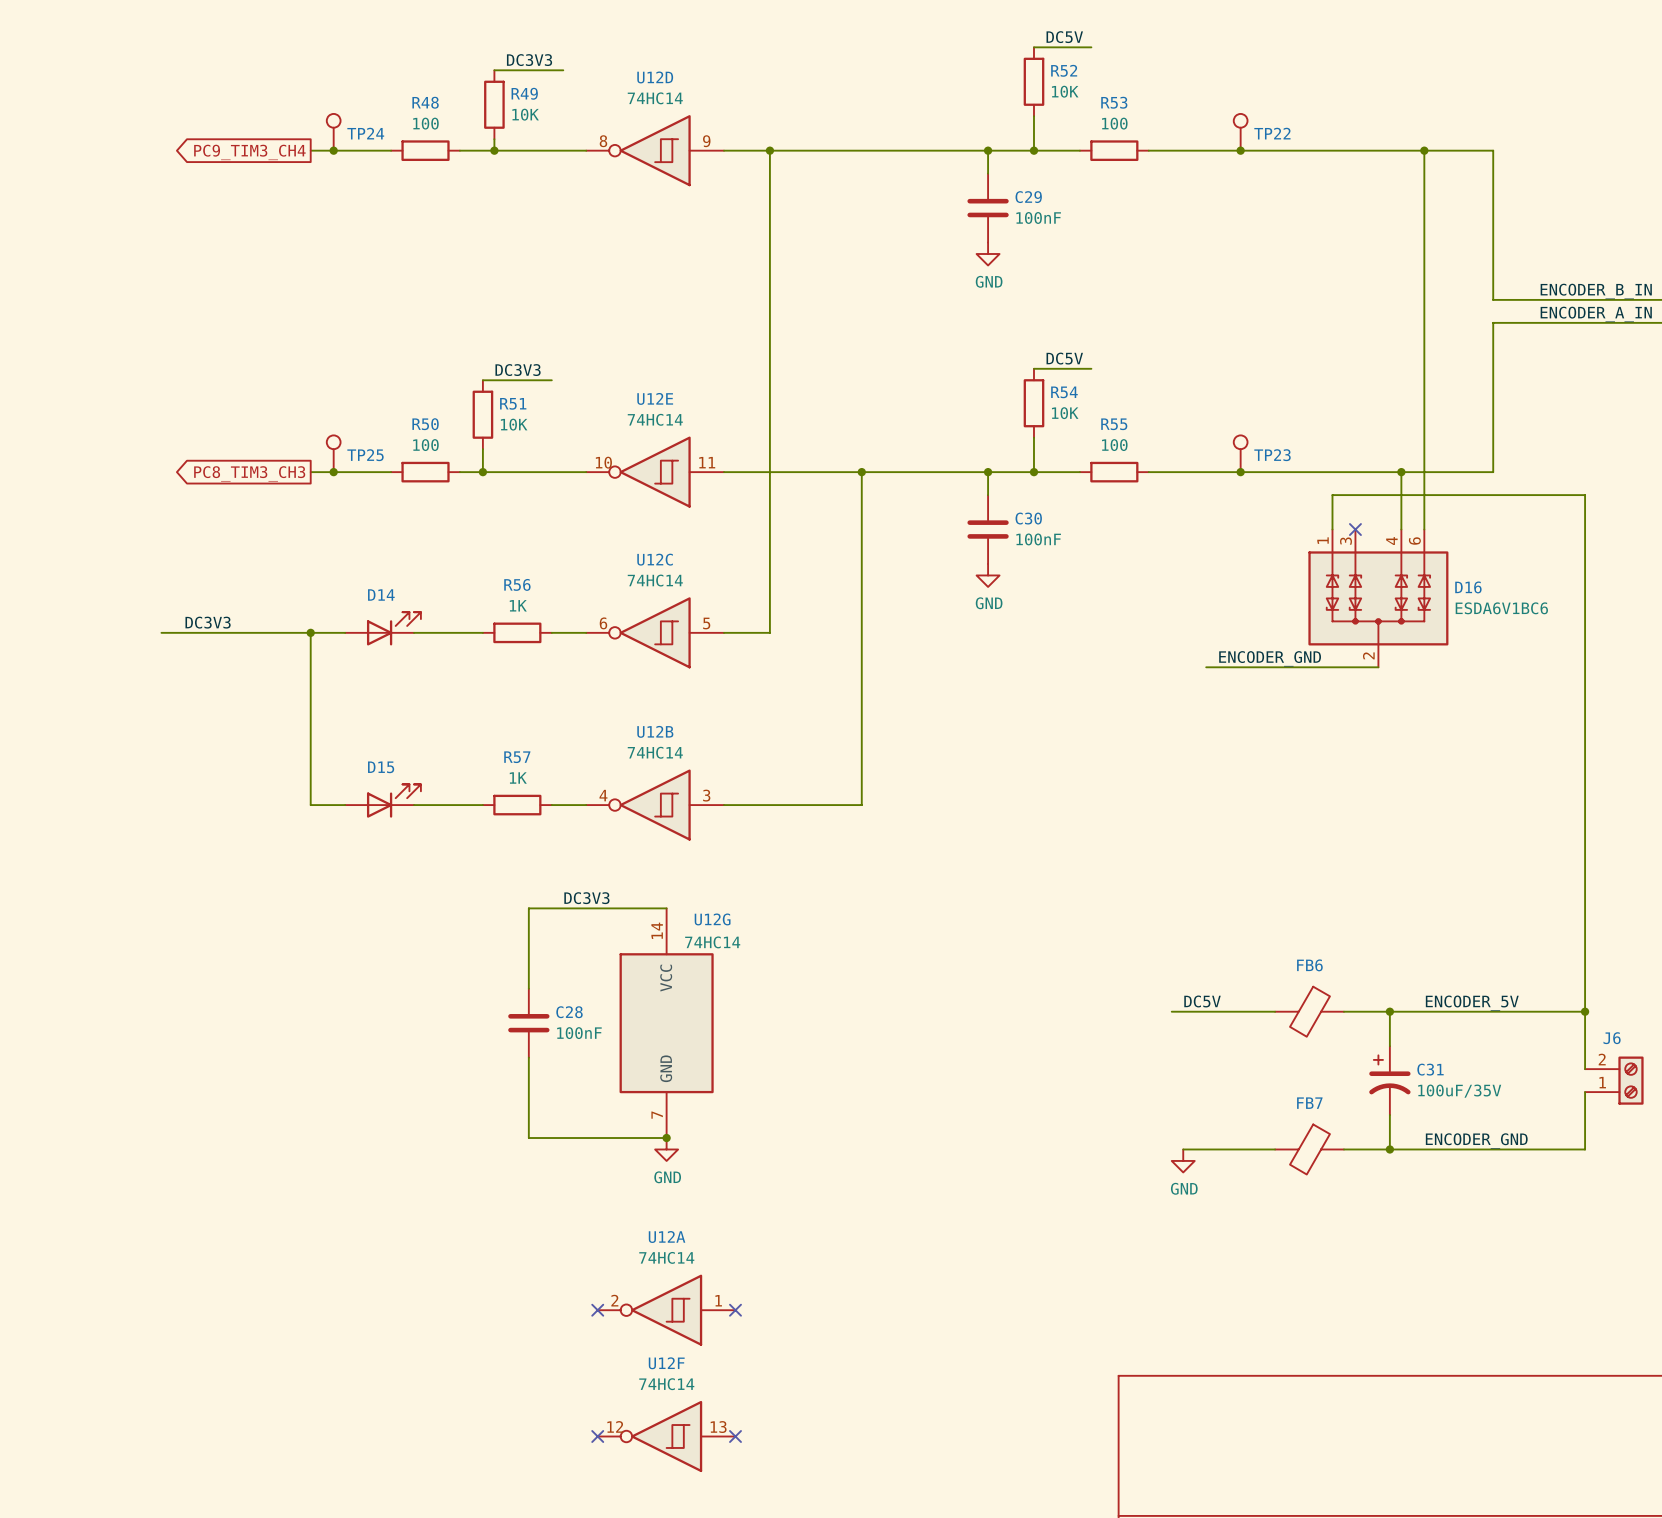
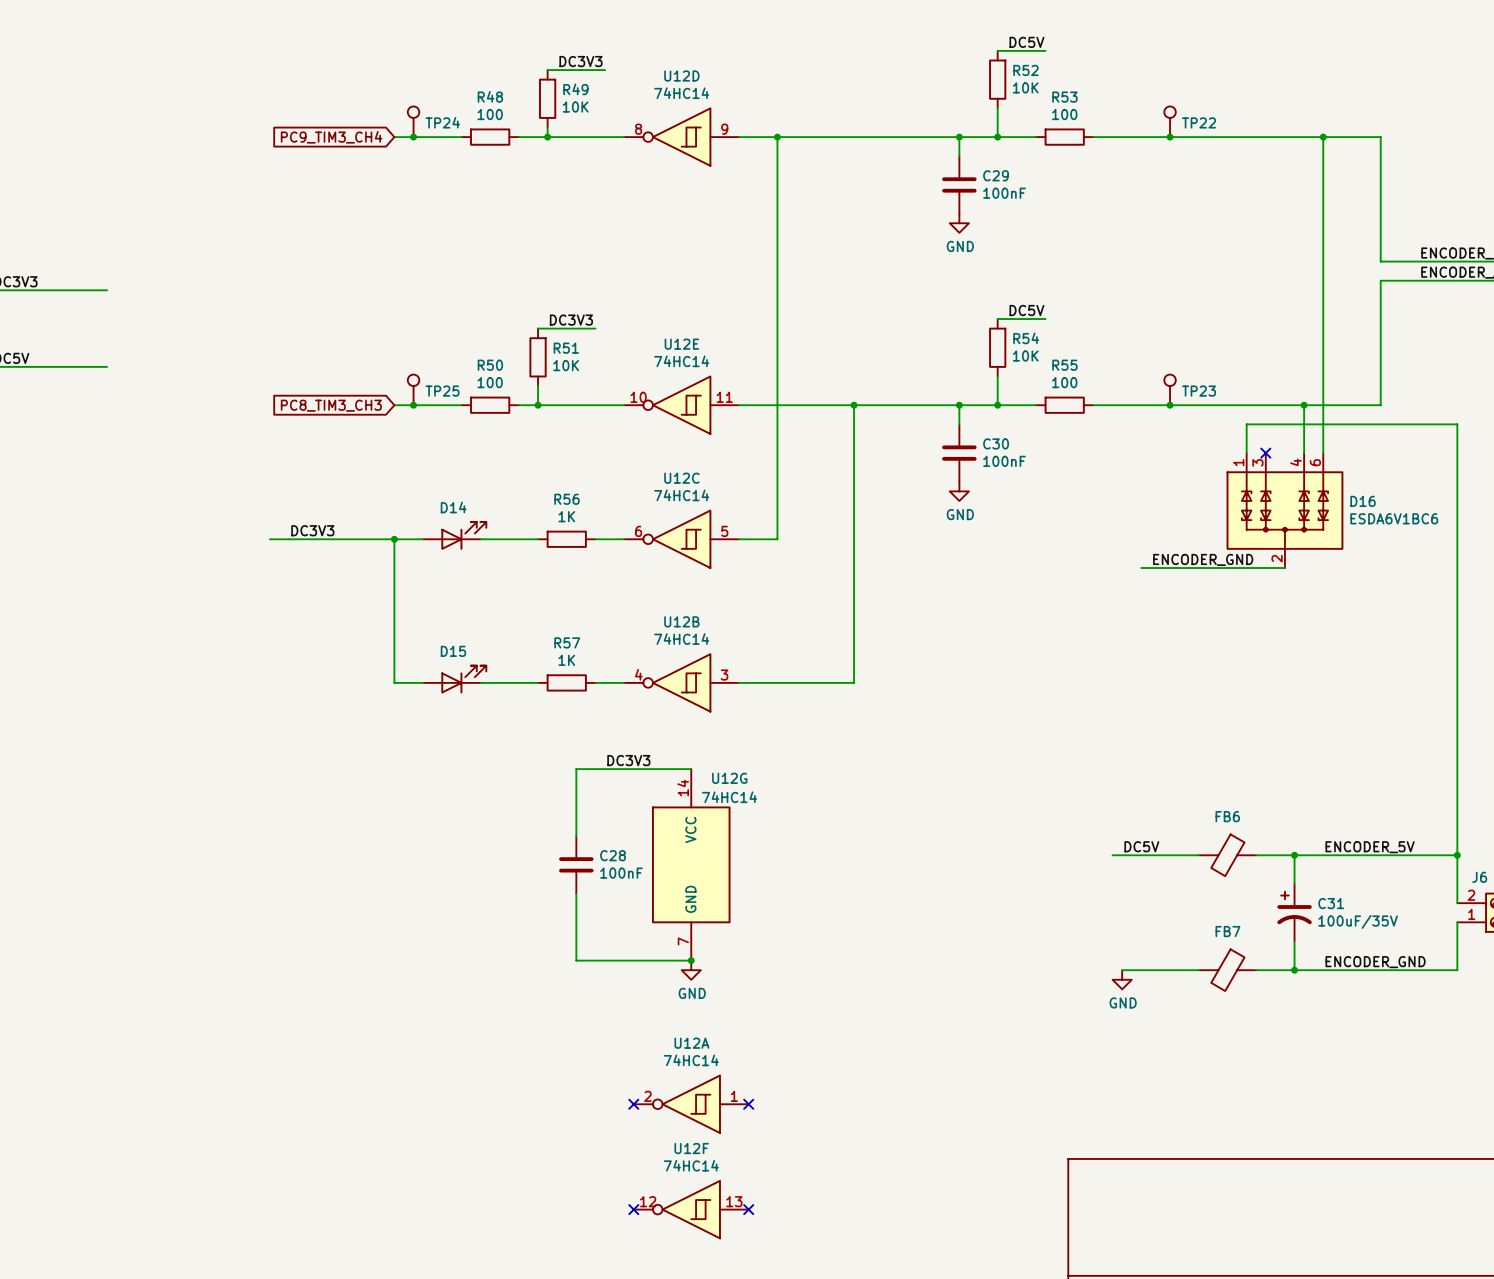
global label shape: output (249, 152) -> input (331, 137)
global label shape: output (249, 473) -> input (331, 405)

